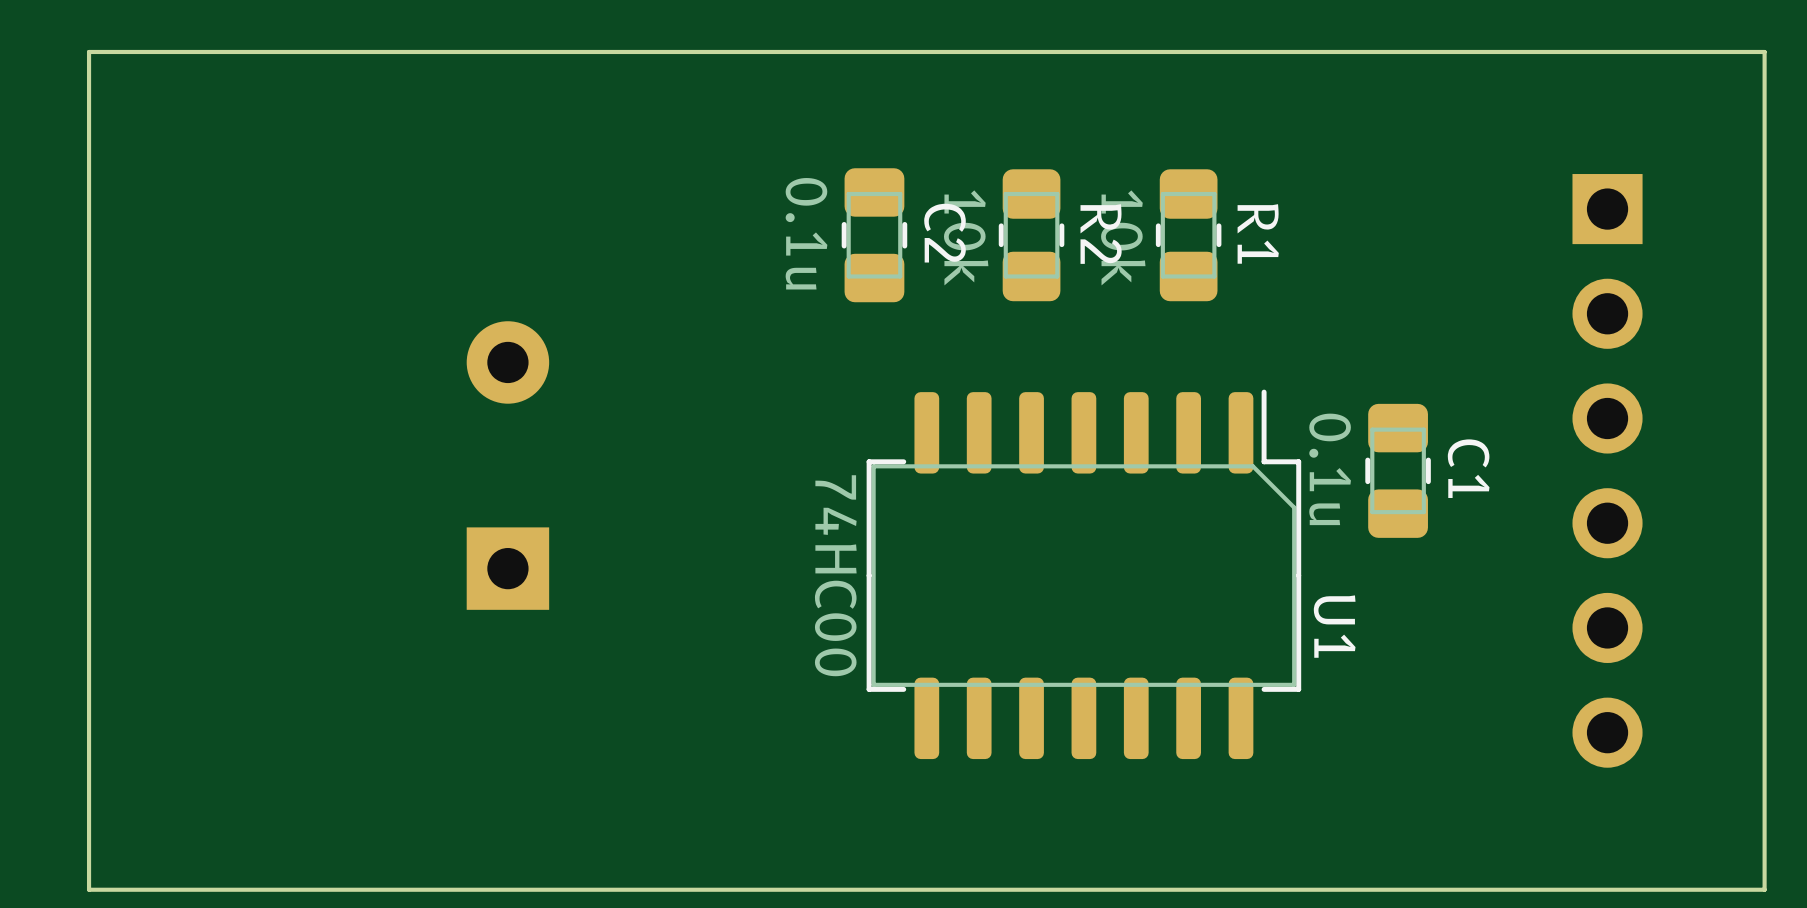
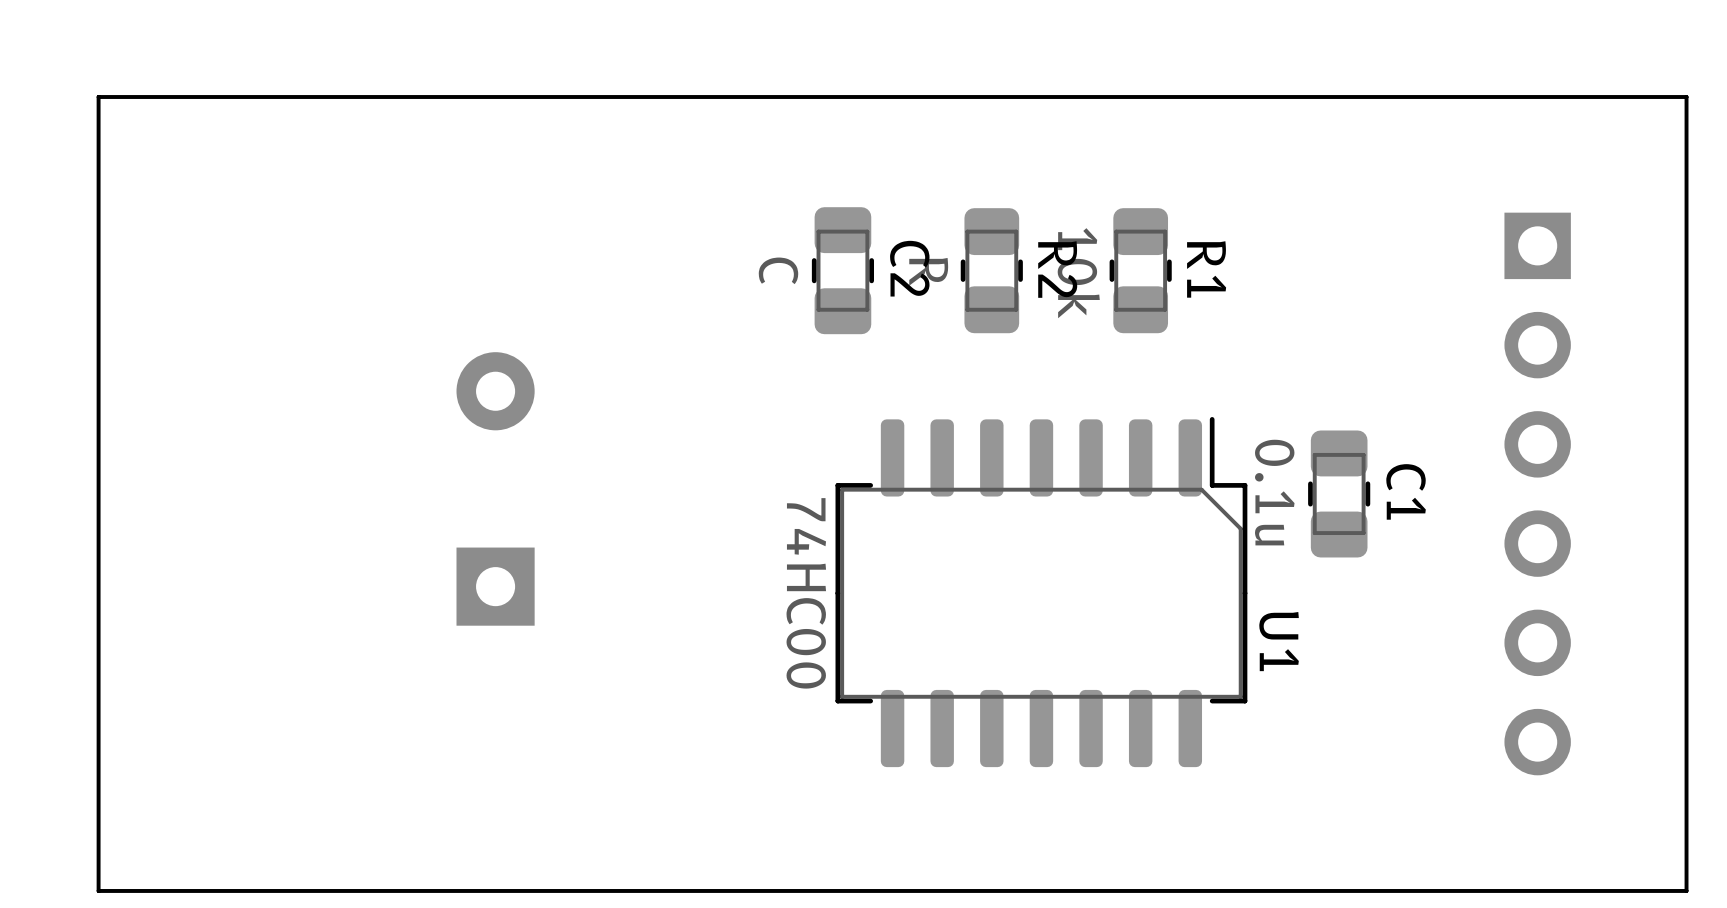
C2 value: 0.1u (806, 233) -> C (778, 270)
R2 value: 10k (966, 237) -> R (928, 271)

